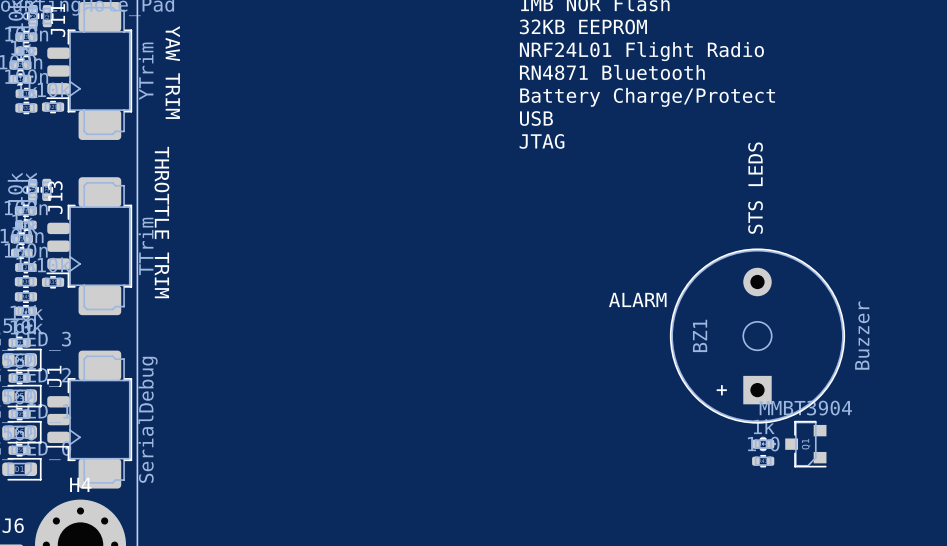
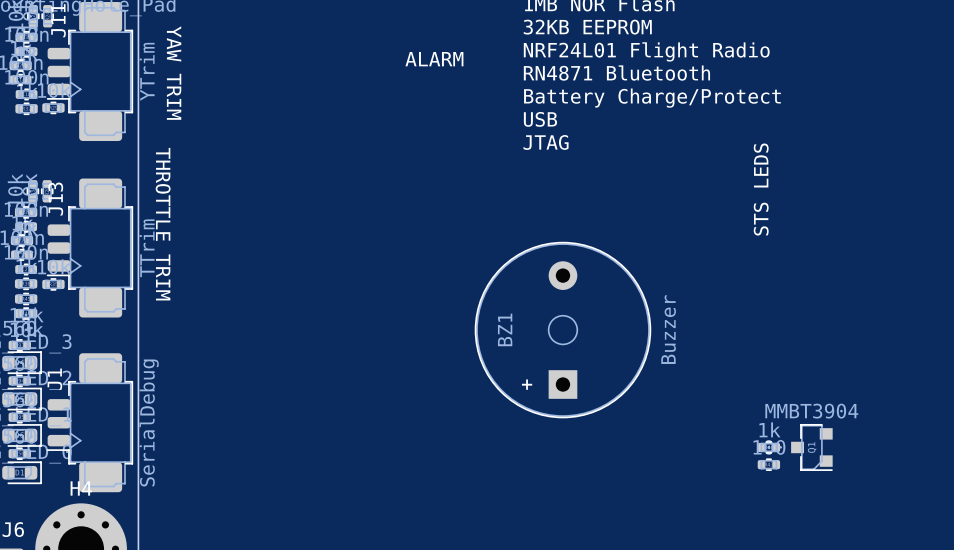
text position: ALARM (637, 299) -> ALARM (434, 59)
BZ1 position: (757, 336) -> (562, 330)

